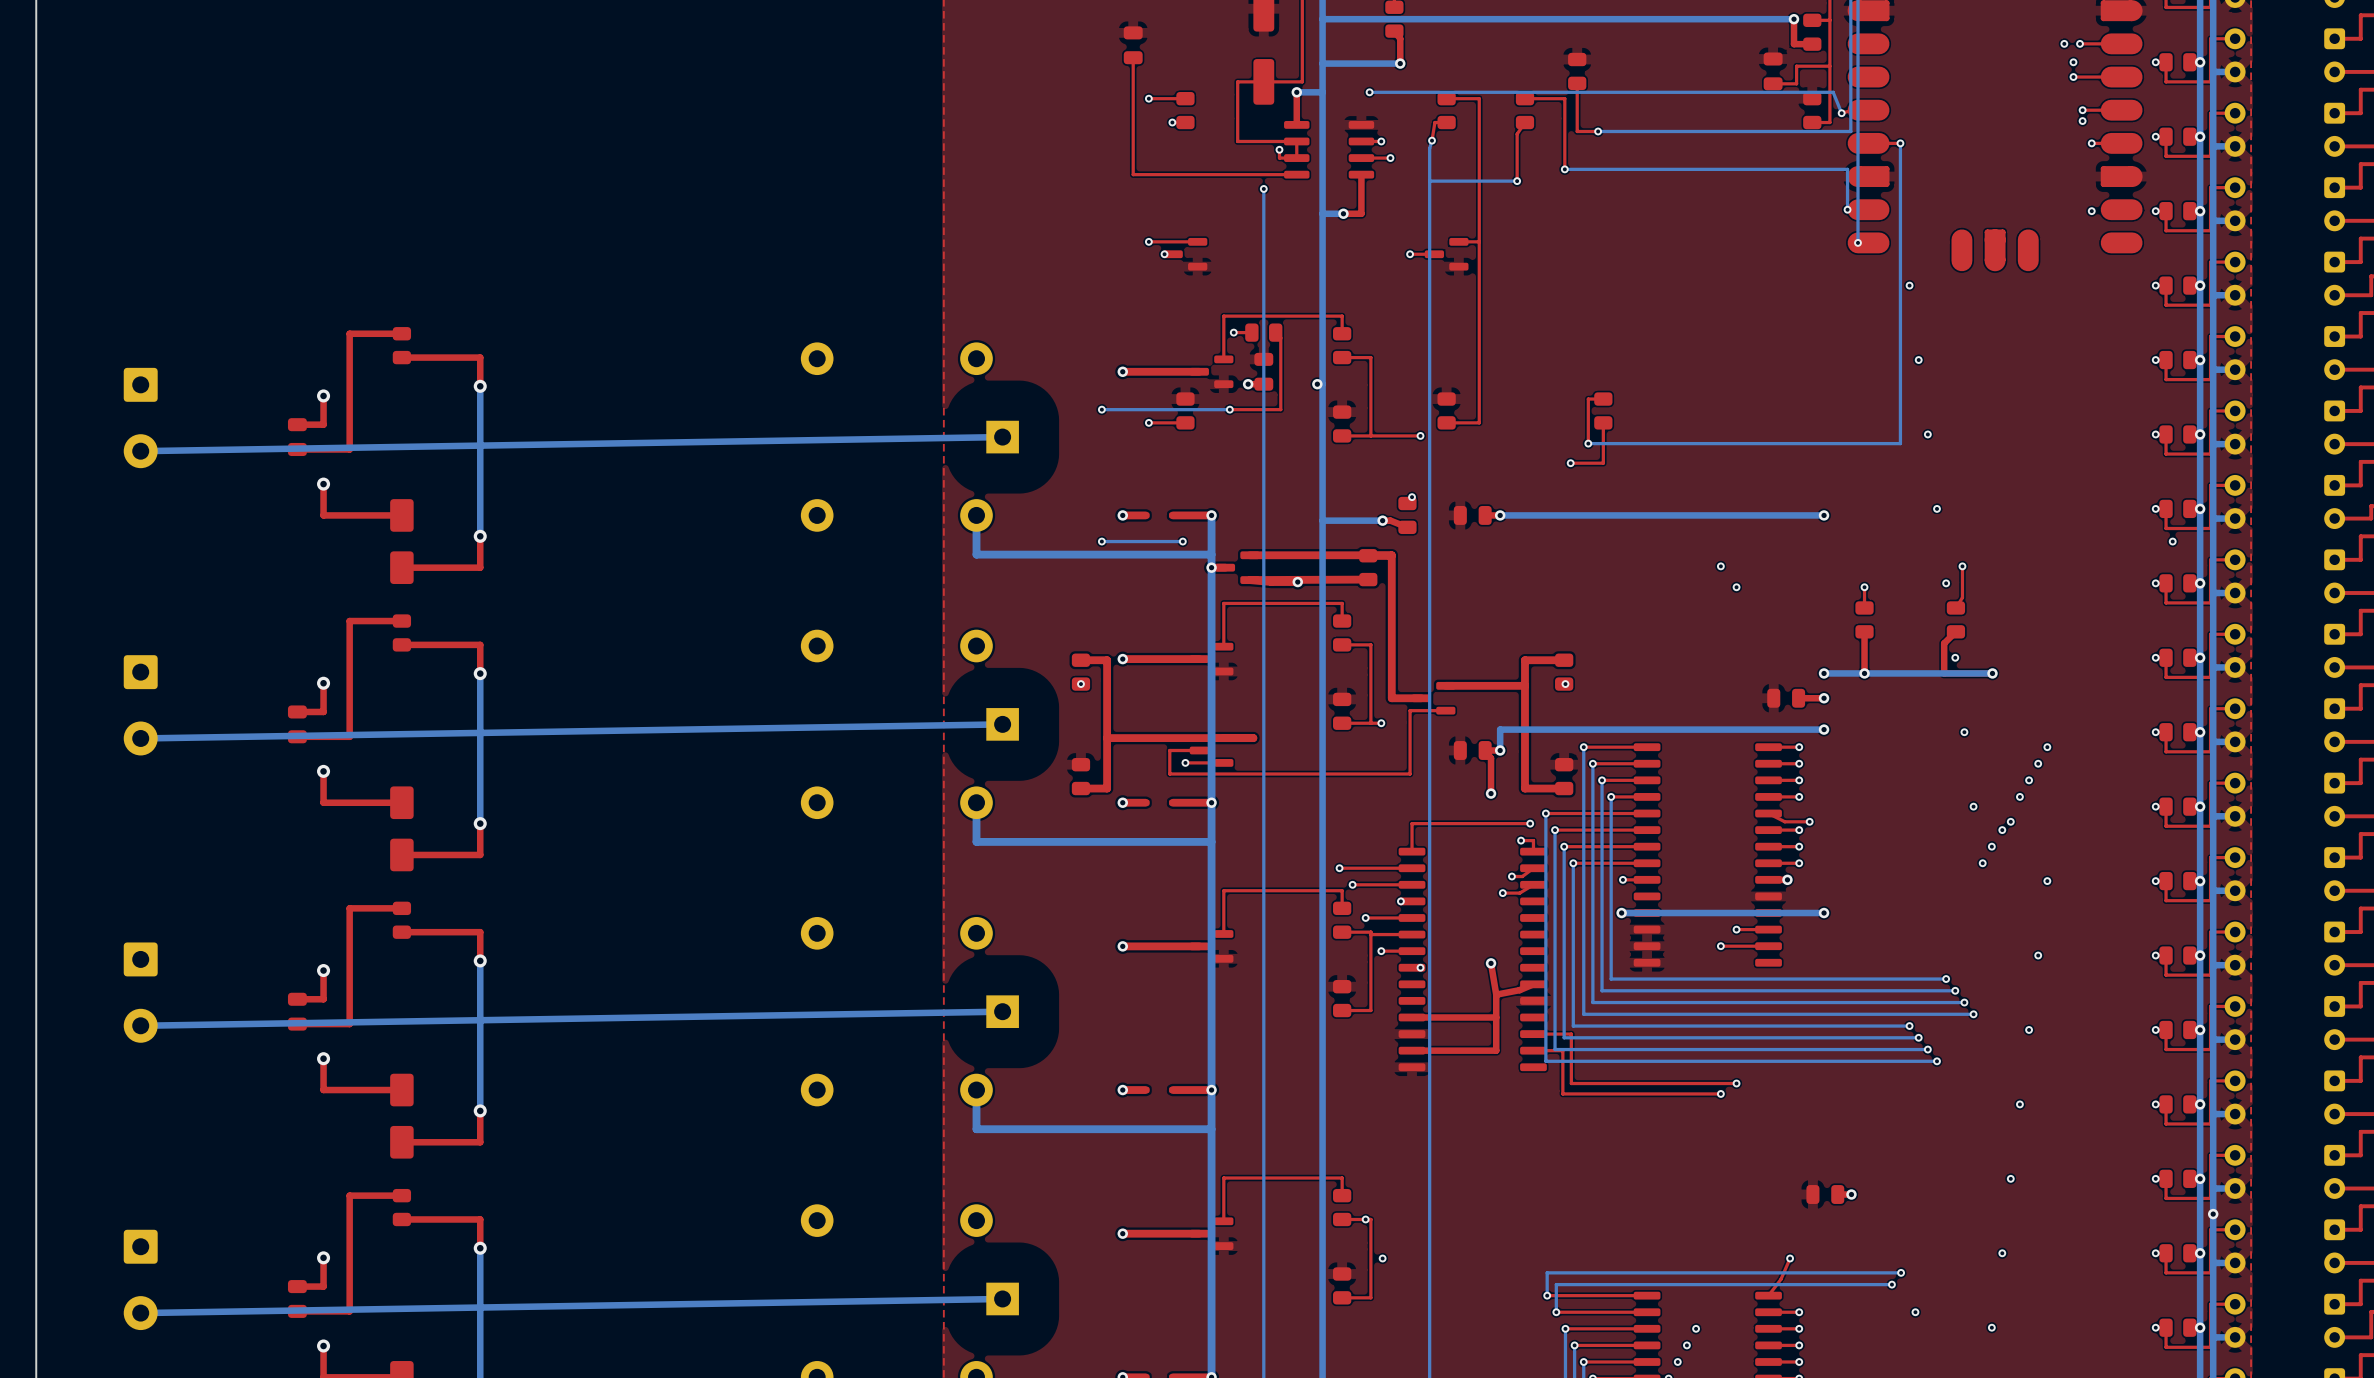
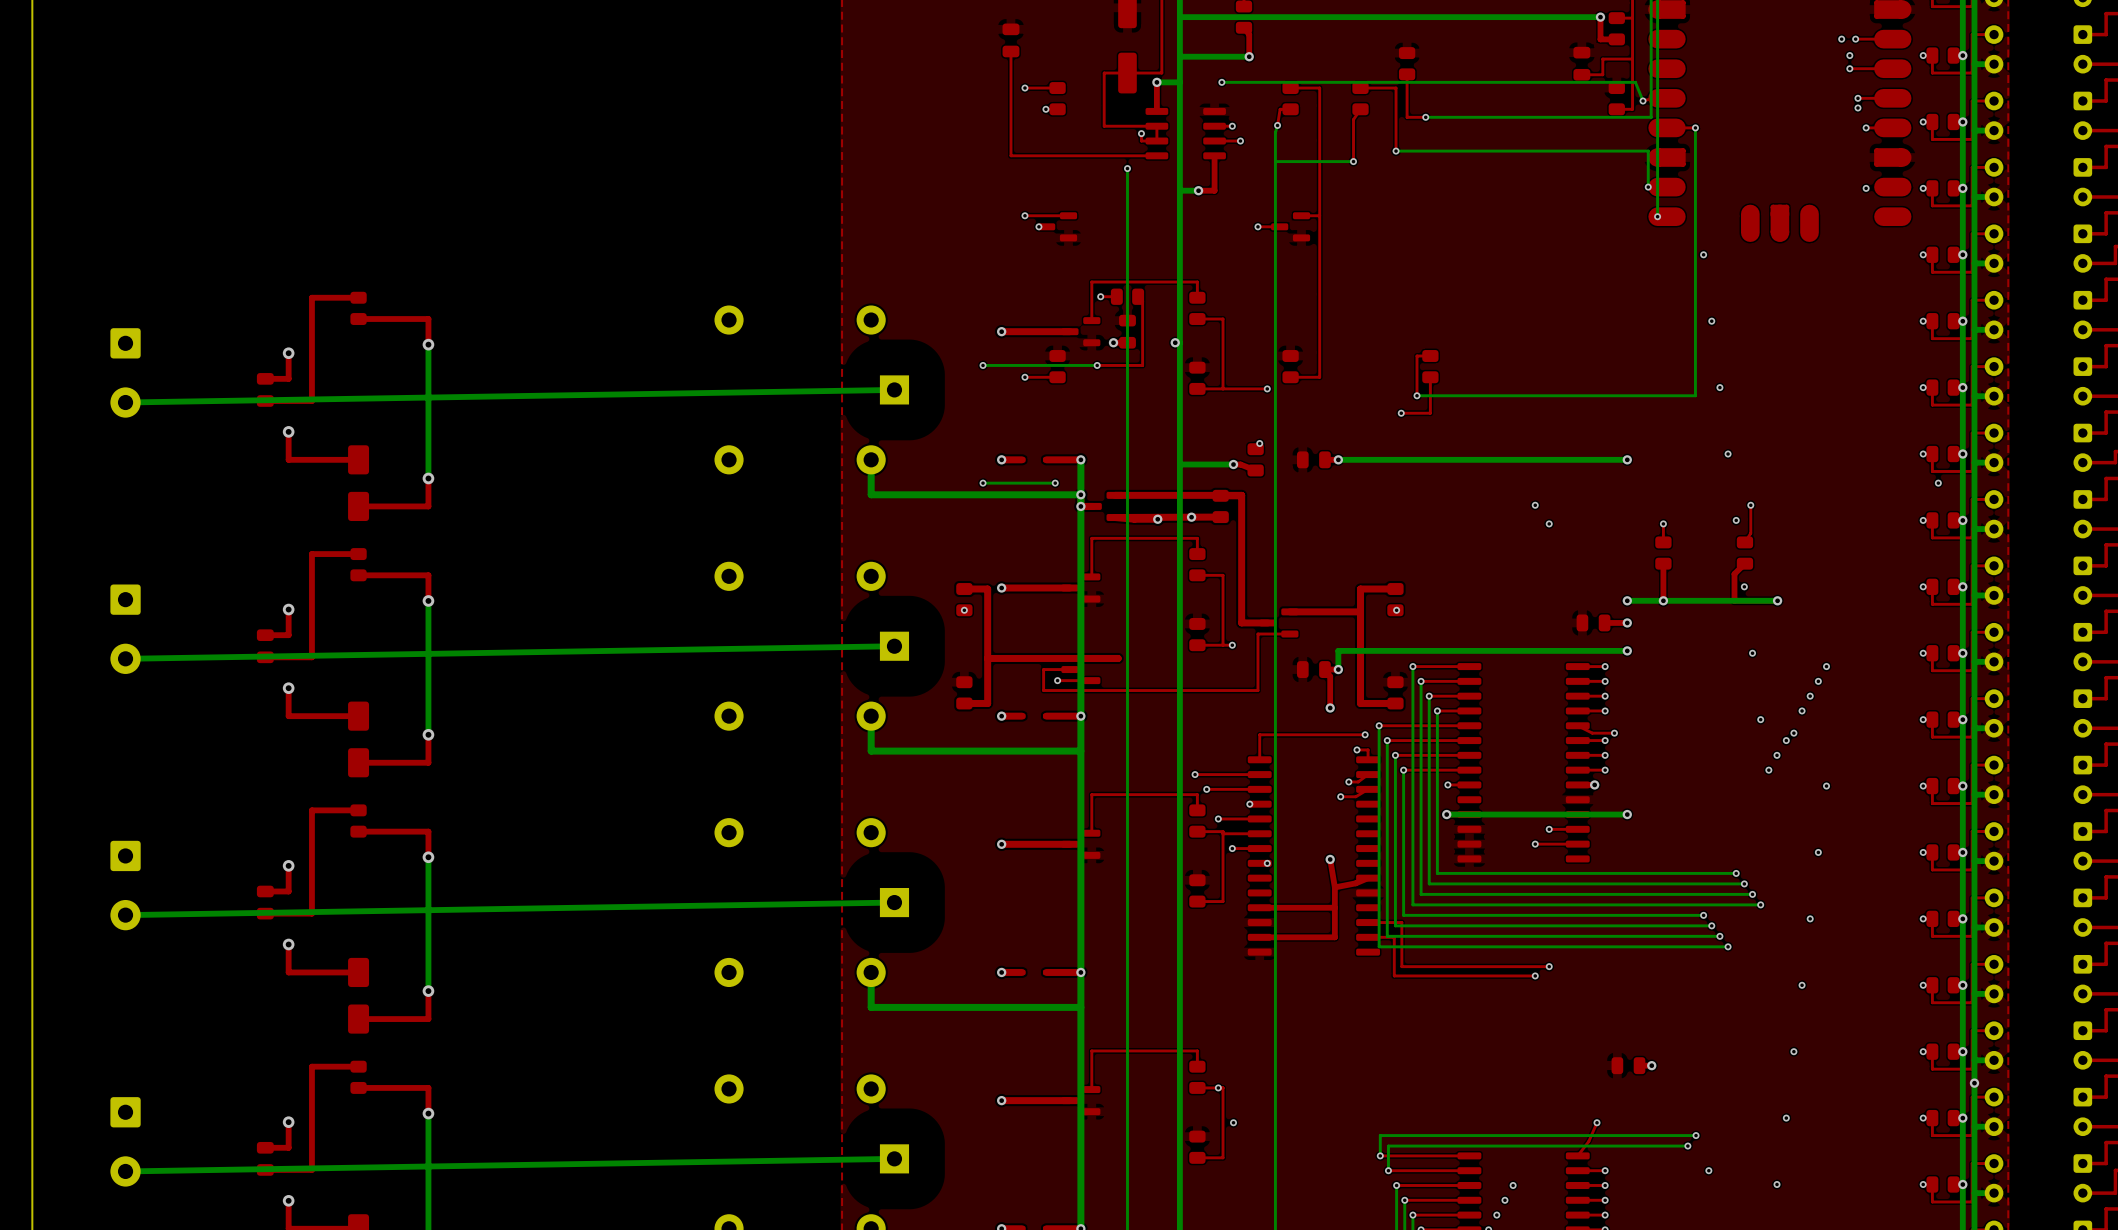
via: none -> (1080, 494)
via: none -> (1191, 517)

